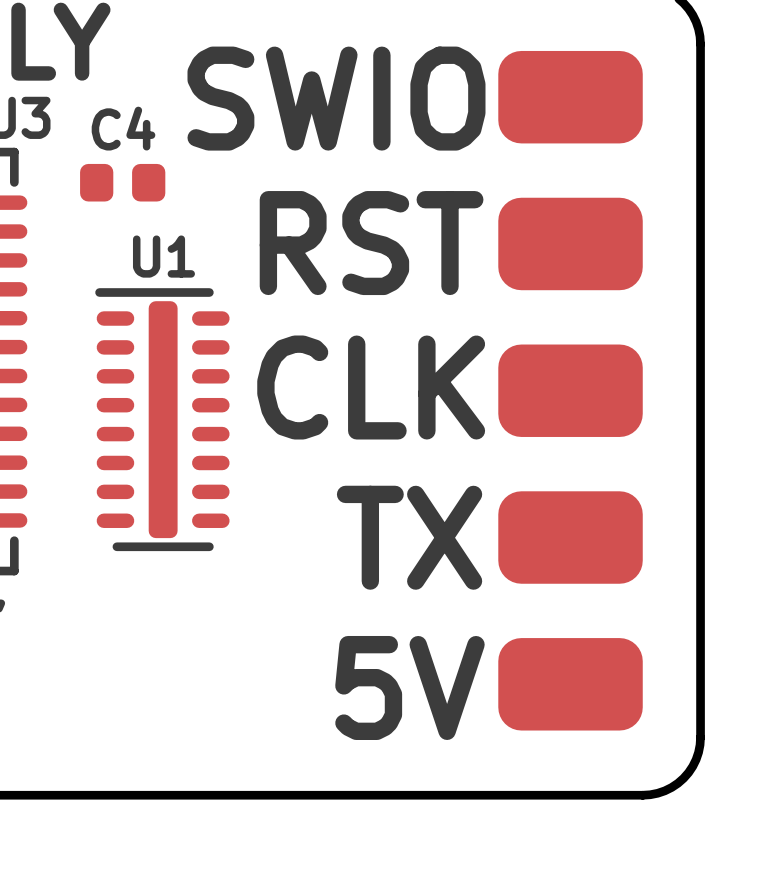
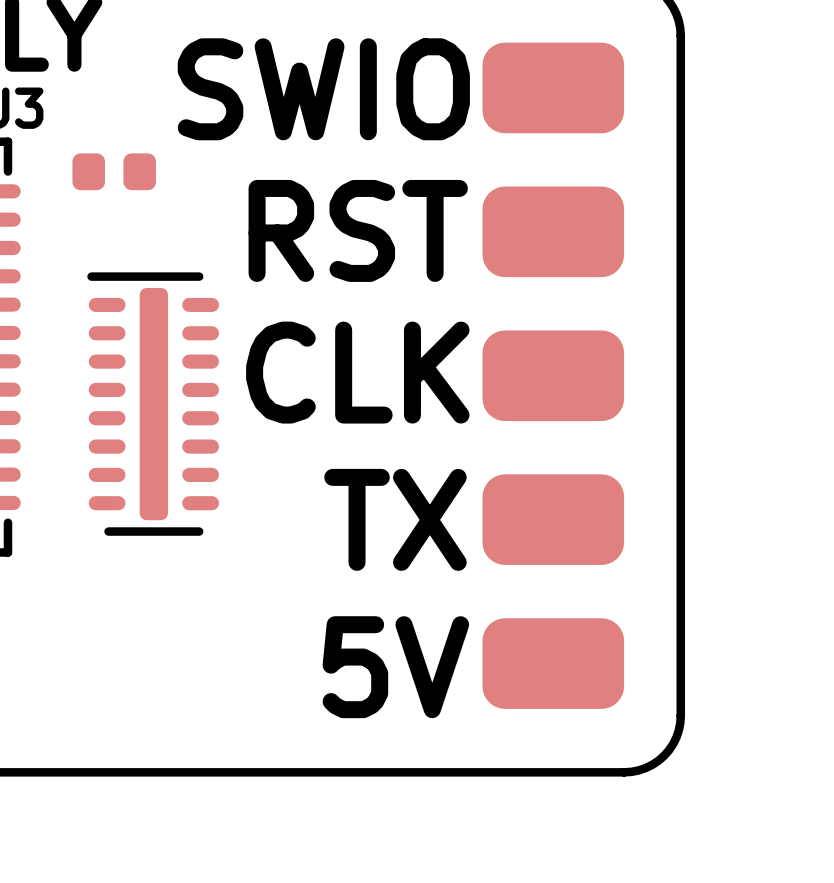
C4 name: C4 (123, 128) -> none
U1: (162, 419) -> none
part: none -> (153, 404)

